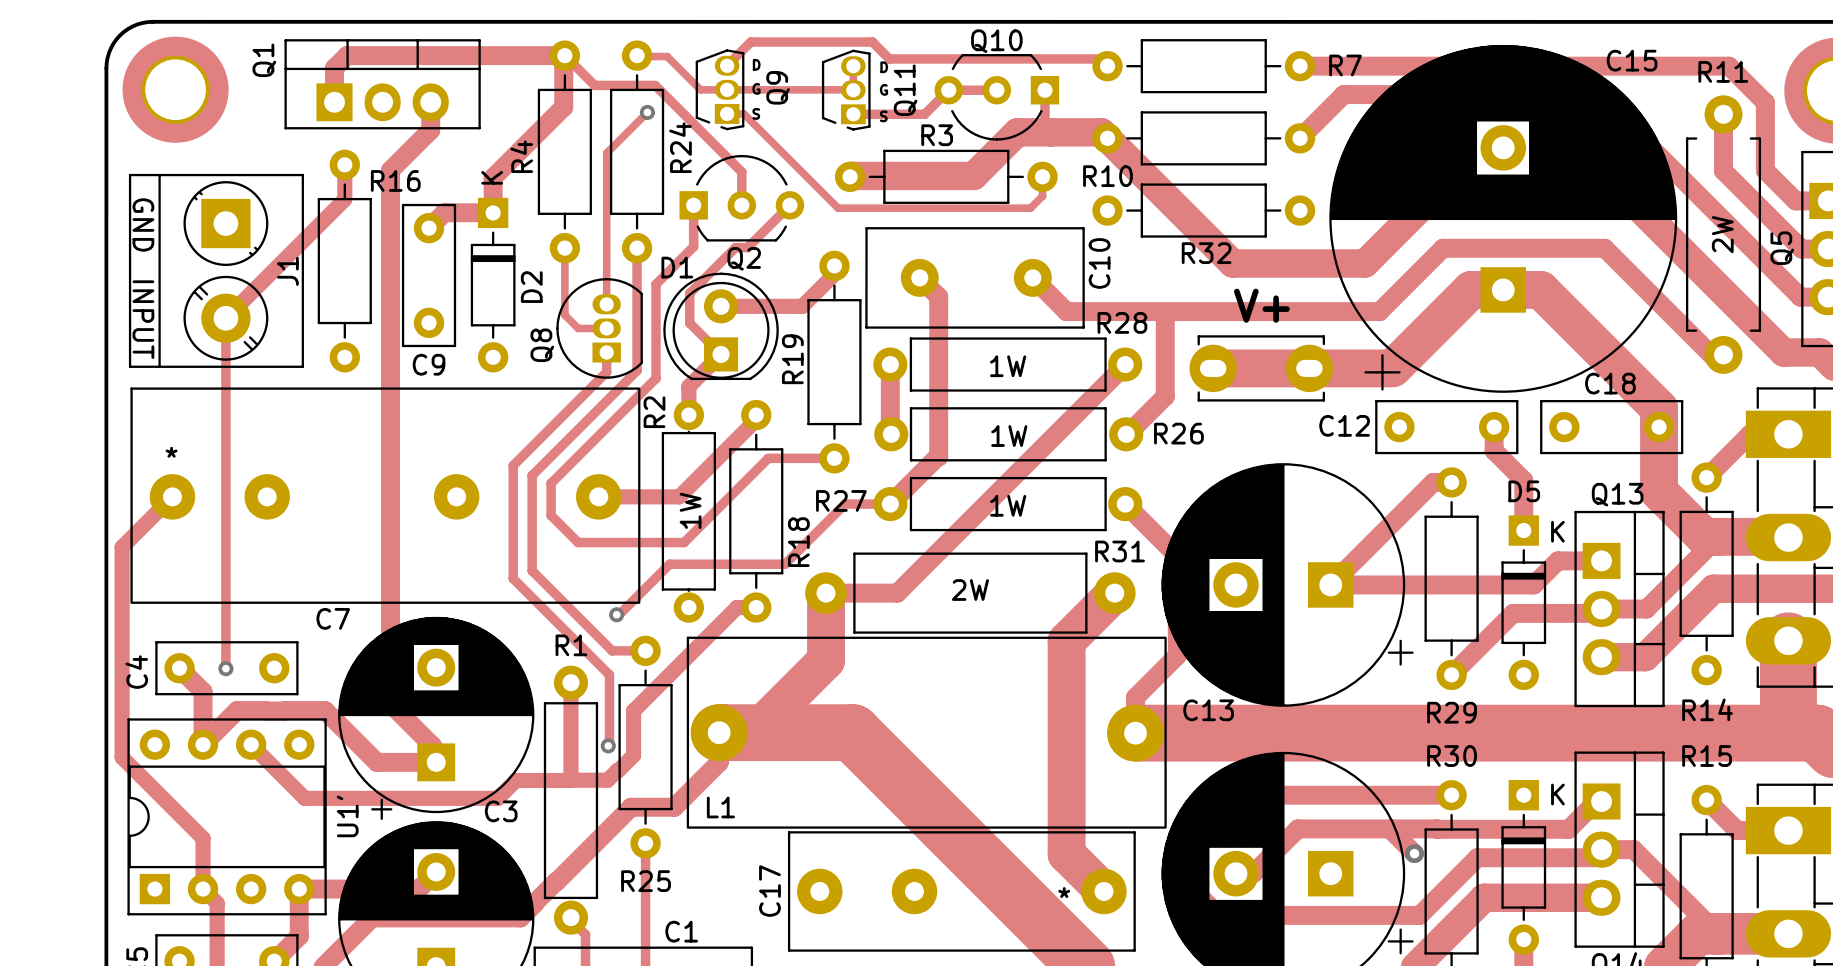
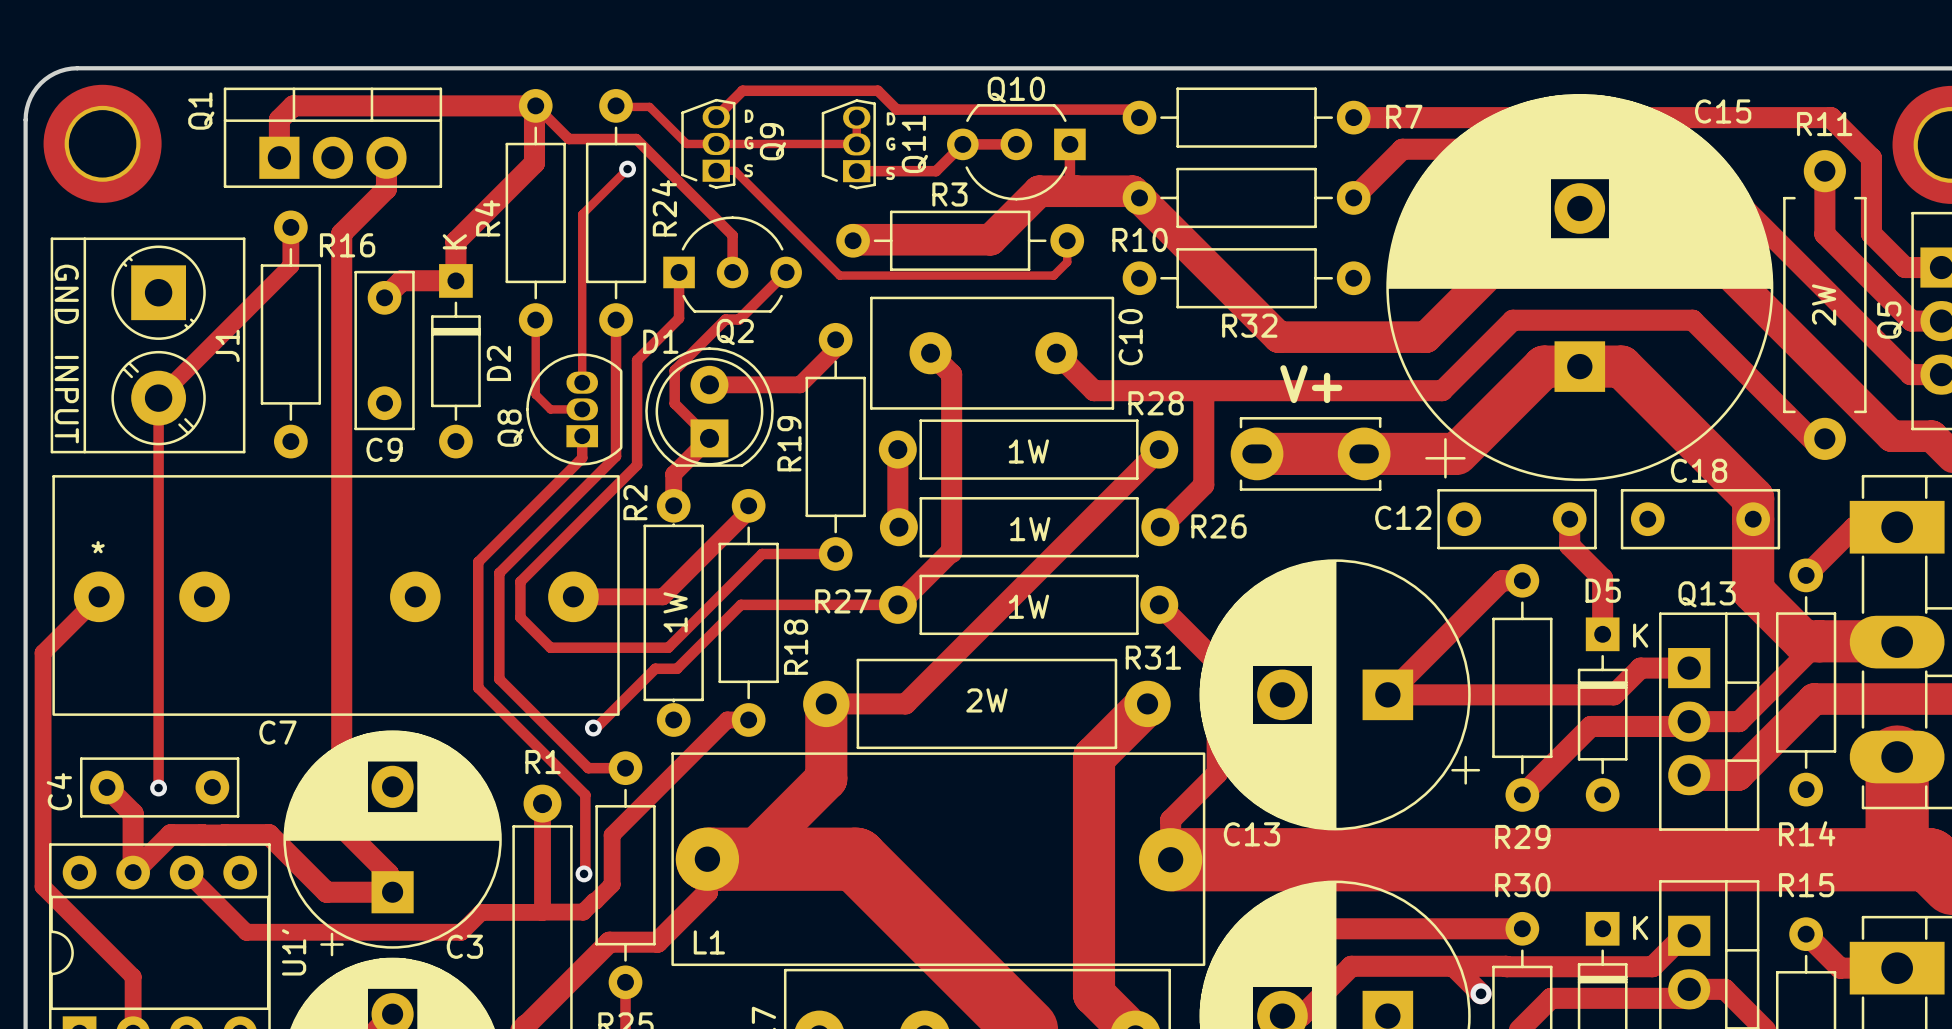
track: (845, 504) (784, 564) (669, 564) -> (847, 604) (740, 604) (677, 668) (655, 668) (652, 671)

